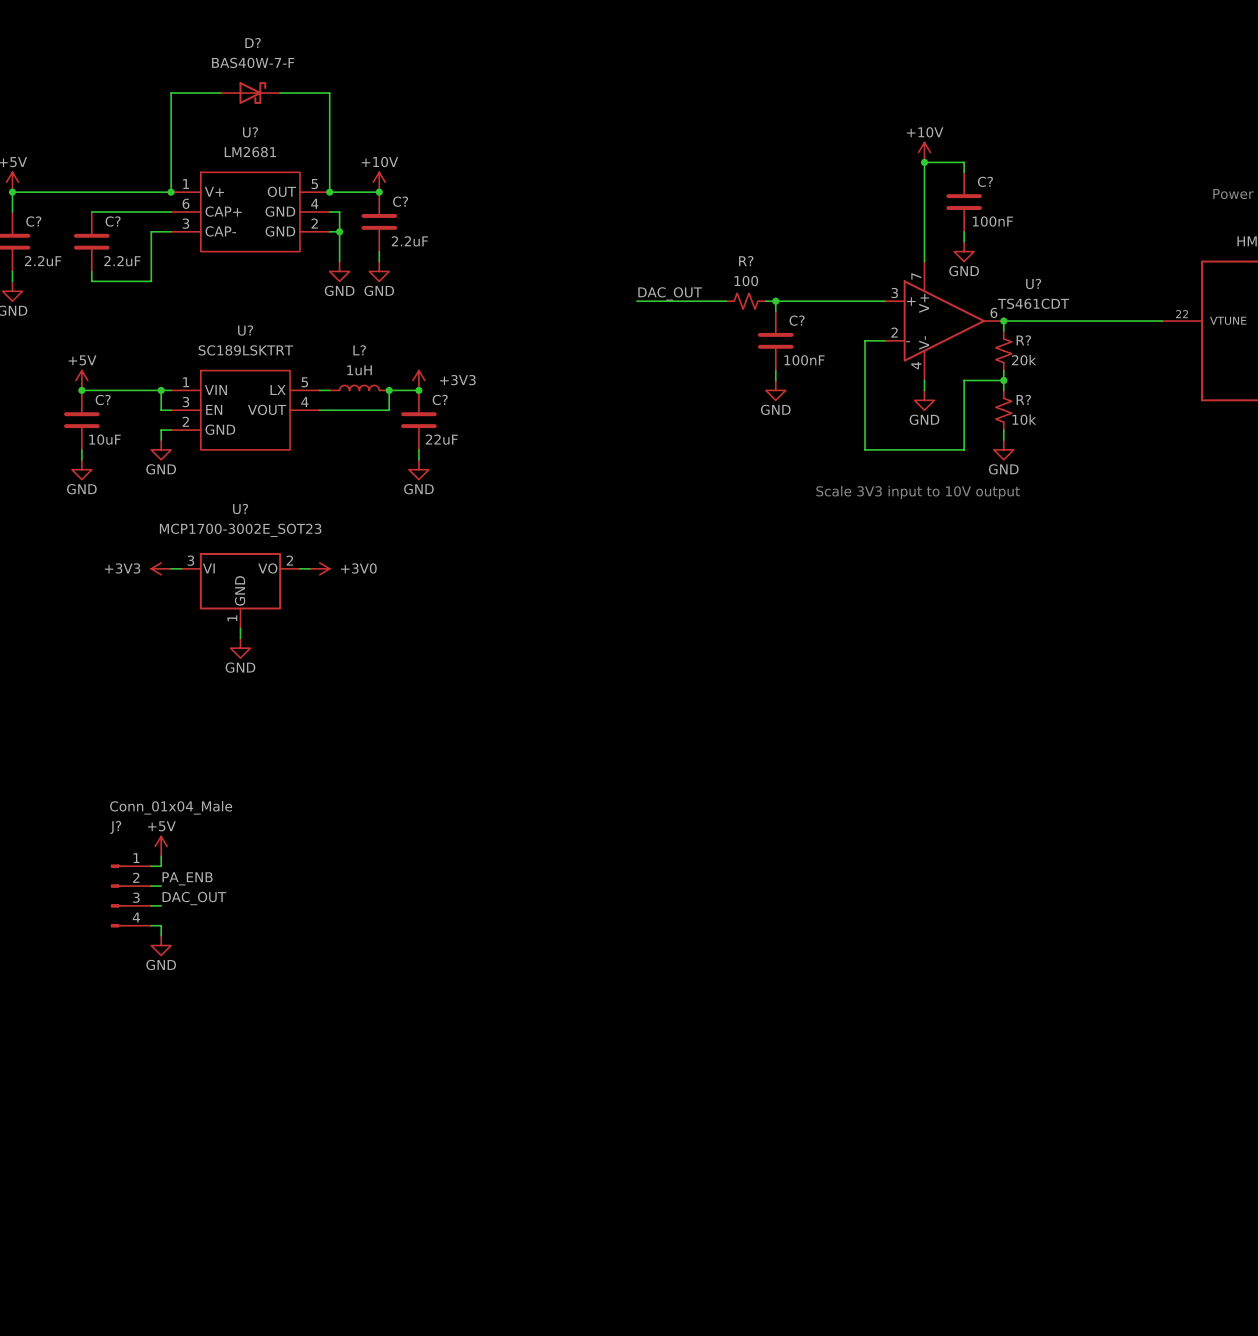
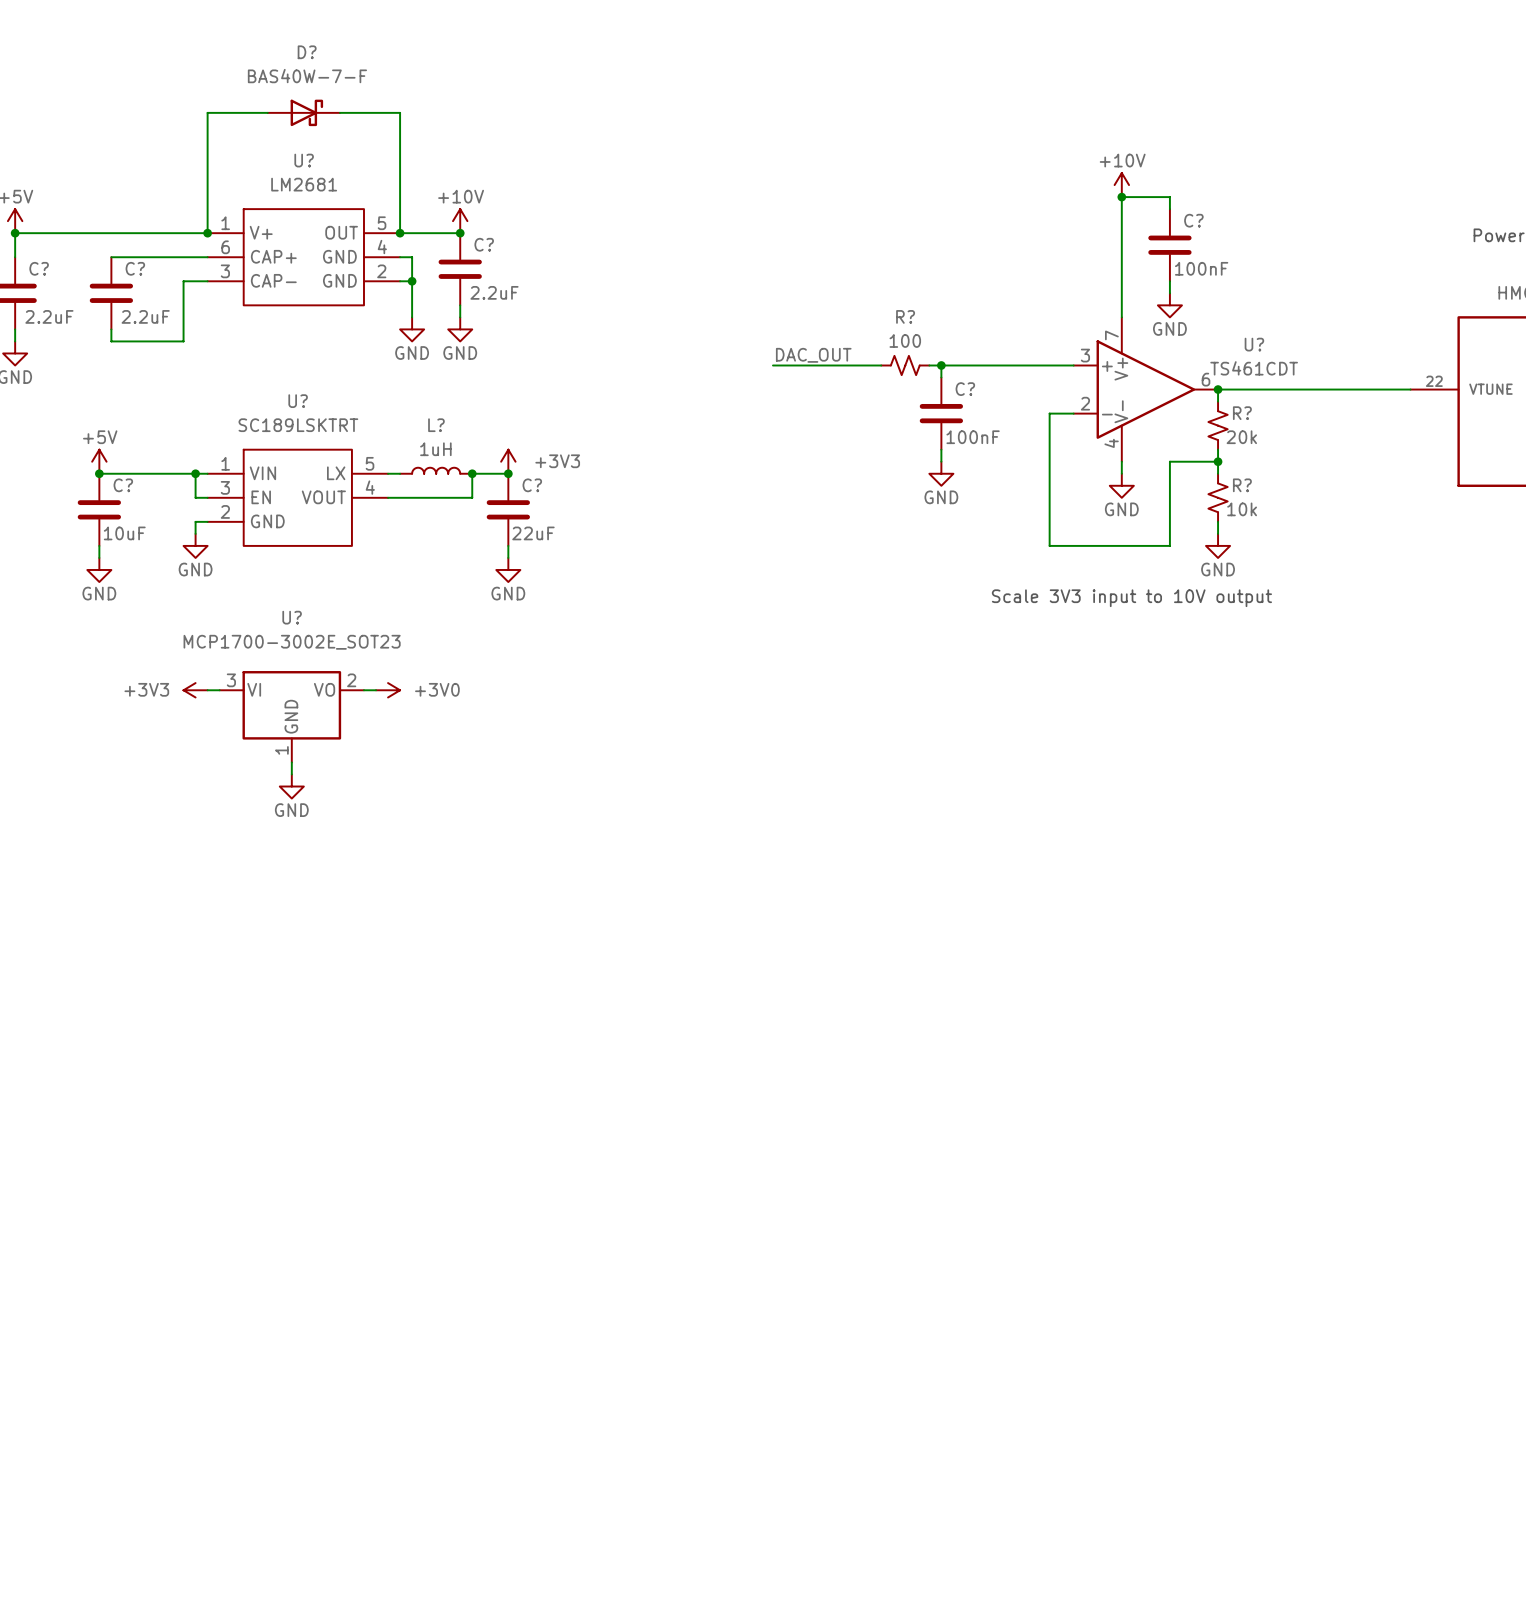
power symbol: +5V (161, 846) -> none
wire: (161, 856) (161, 866) (151, 866) -> none
label: PA_ENB (187, 878) -> none
wire: (151, 886) (161, 886) -> none
J?: Conn_01x04_Male (131, 895) -> none
label: DAC_OUT (194, 898) -> none
wire: (151, 905) (161, 905) -> none
wire: (151, 925) (161, 925) (161, 935) -> none
power symbol: GND (161, 945) -> none

